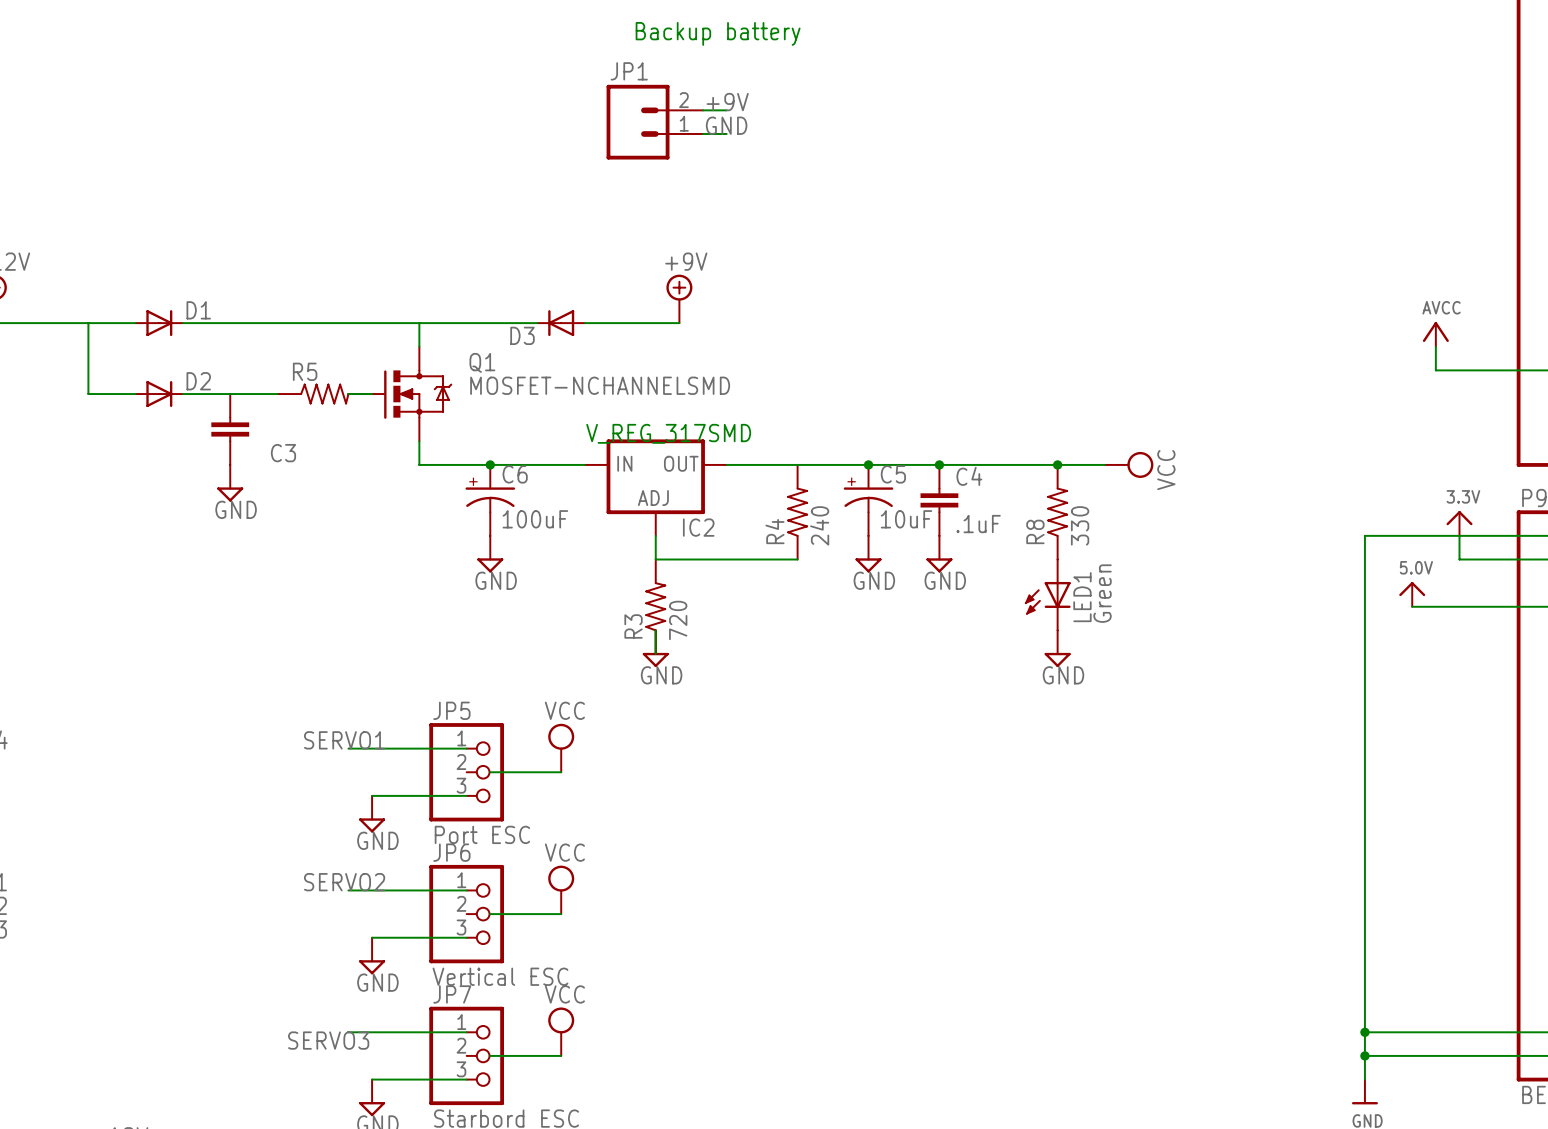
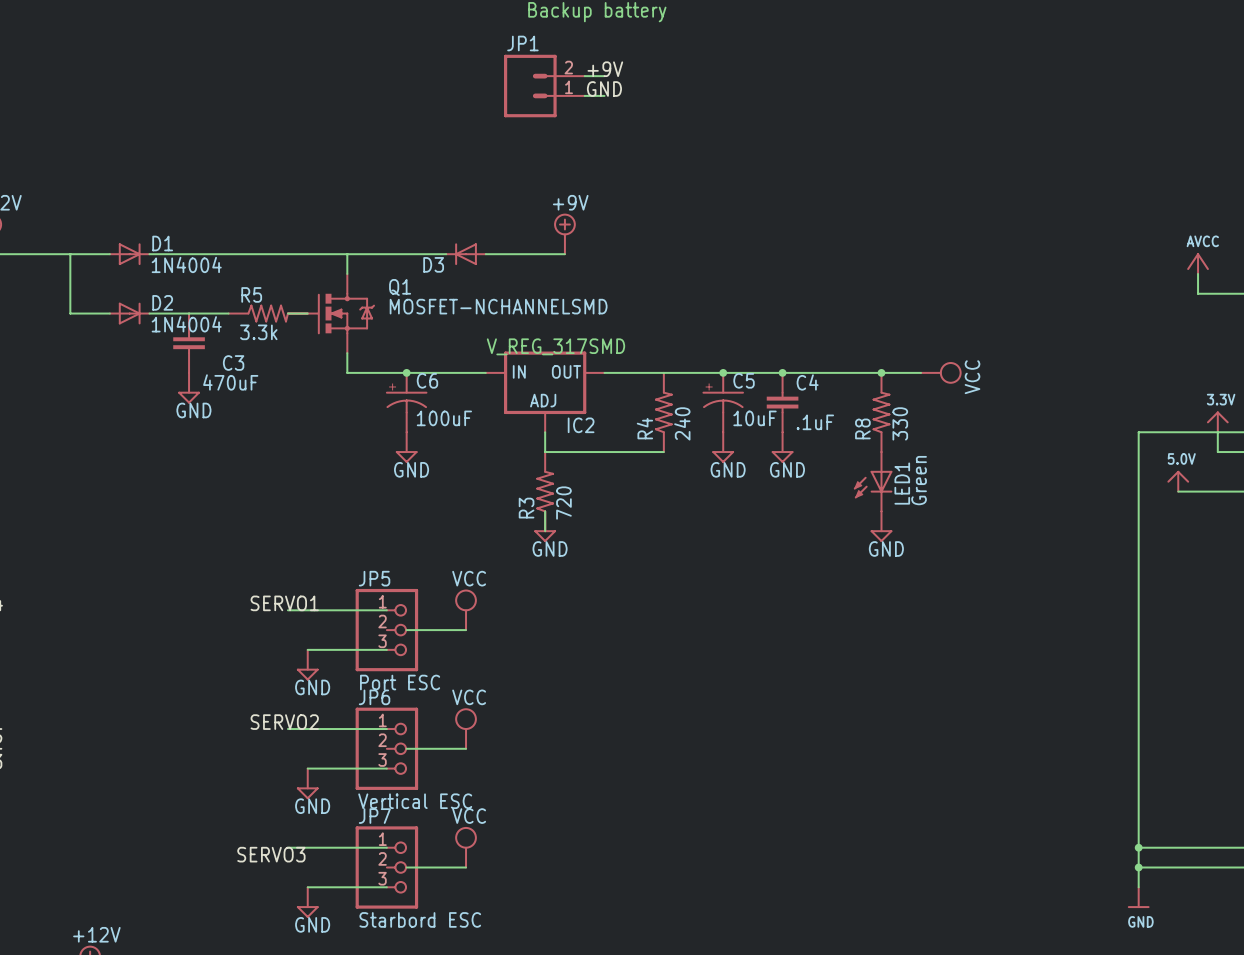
D1 value: none -> 1N4004 (186, 264)
D2 value: none -> 1N4004 (186, 324)
R5 value: none -> 3.3k (258, 332)
C3 value: none -> 470uF (230, 382)

